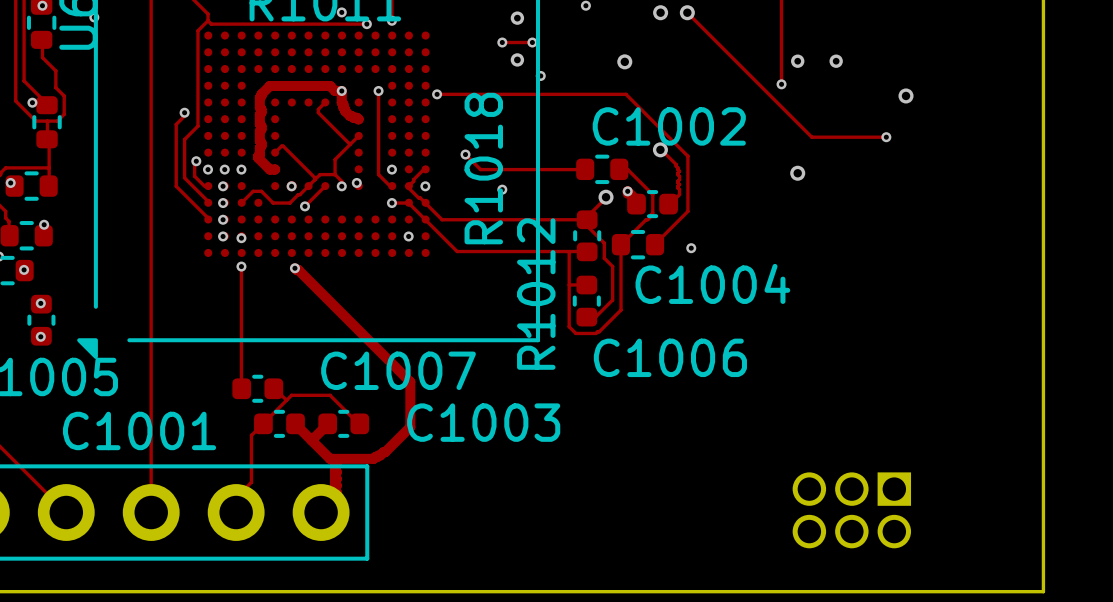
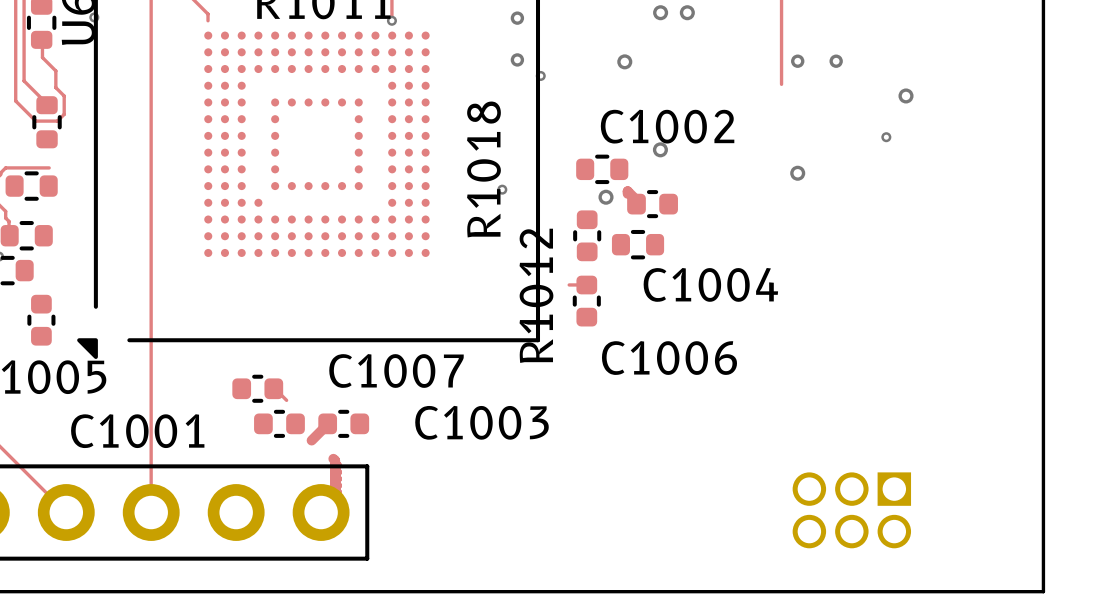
via: (42, 5) -> none
via: (585, 5) -> none
via: (341, 12) -> none
track: (687, 12) (811, 137) (886, 137) -> none
track: (366, 24) (211, 24) (208, 20) (197, 30) (197, 126) (184, 139) (184, 177) (208, 201) -> none
via: (366, 24) -> none
track: (502, 42) (532, 42) -> none
via: (502, 42) -> none
via: (532, 42) -> none
via: (781, 84) -> none
via: (341, 91) -> none
track: (378, 91) (378, 174) (390, 186) -> none
via: (378, 91) -> none
track: (437, 94) (626, 94) (687, 156) (687, 211) (654, 244) -> none
via: (437, 94) -> none
via: (32, 102) -> none
track: (325, 102) (318, 109) (318, 112) (350, 144) -> none
via: (184, 112) -> none
track: (186, 114) (176, 124) (176, 186) (208, 218) -> none
track: (358, 119) (350, 116) (345, 111) (341, 102) (341, 91) (335, 91) (330, 85) (269, 85) (259, 97) (261, 146) (258, 157) (269, 169) (274, 169) -> none
track: (47, 121) (49, 186) -> none
track: (358, 136) (335, 159) (335, 174) -> none
track: (660, 149) (676, 164) (679, 171) (677, 172) (679, 194) (668, 204) -> none
track: (274, 152) (283, 146) (315, 179) -> none
track: (465, 154) (480, 169) (585, 169) -> none
via: (465, 154) -> none
via: (196, 161) -> none
track: (194, 162) (194, 176) (204, 186) -> none
via: (208, 169) -> none
via: (224, 169) -> none
via: (241, 169) -> none
via: (391, 169) -> none
track: (425, 169) (413, 179) (408, 187) (442, 219) (587, 219) -> none
track: (619, 169) (627, 169) (652, 194) (652, 213) (621, 244) (621, 310) (595, 333) (575, 333) (569, 326) (569, 251) -> none
track: (335, 174) (341, 181) (341, 186) -> none
track: (335, 174) (320, 174) (289, 203) (273, 203) (261, 191) (253, 191) (241, 203) -> none
via: (10, 182) -> none
via: (356, 182) -> none
via: (223, 186) -> none
via: (291, 186) -> none
track: (325, 186) (304, 206) -> none
via: (341, 186) -> none
via: (425, 186) -> none
via: (627, 191) -> none
track: (606, 197) (587, 216) (587, 226) (604, 243) (604, 258) (612, 266) (612, 300) (595, 316) (586, 317) -> none
via: (223, 203) -> none
track: (391, 203) (408, 203) (457, 251) (587, 251) -> none
via: (391, 203) -> none
via: (304, 206) -> none
via: (223, 219) -> none
via: (44, 224) -> none
via: (223, 236) -> none
via: (408, 236) -> none
via: (241, 238) -> none
via: (691, 248) -> none
track: (241, 266) (241, 388) -> none
via: (241, 266) -> none
track: (294, 268) (410, 381) (410, 427) (385, 452) (373, 458) (330, 458) (294, 423) -> none
via: (294, 268) -> none
via: (24, 269) -> none
via: (40, 303) -> none
via: (40, 336) -> none
track: (360, 423) (330, 395) (291, 395) (251, 435) (251, 482) (229, 504) (236, 512) -> none

